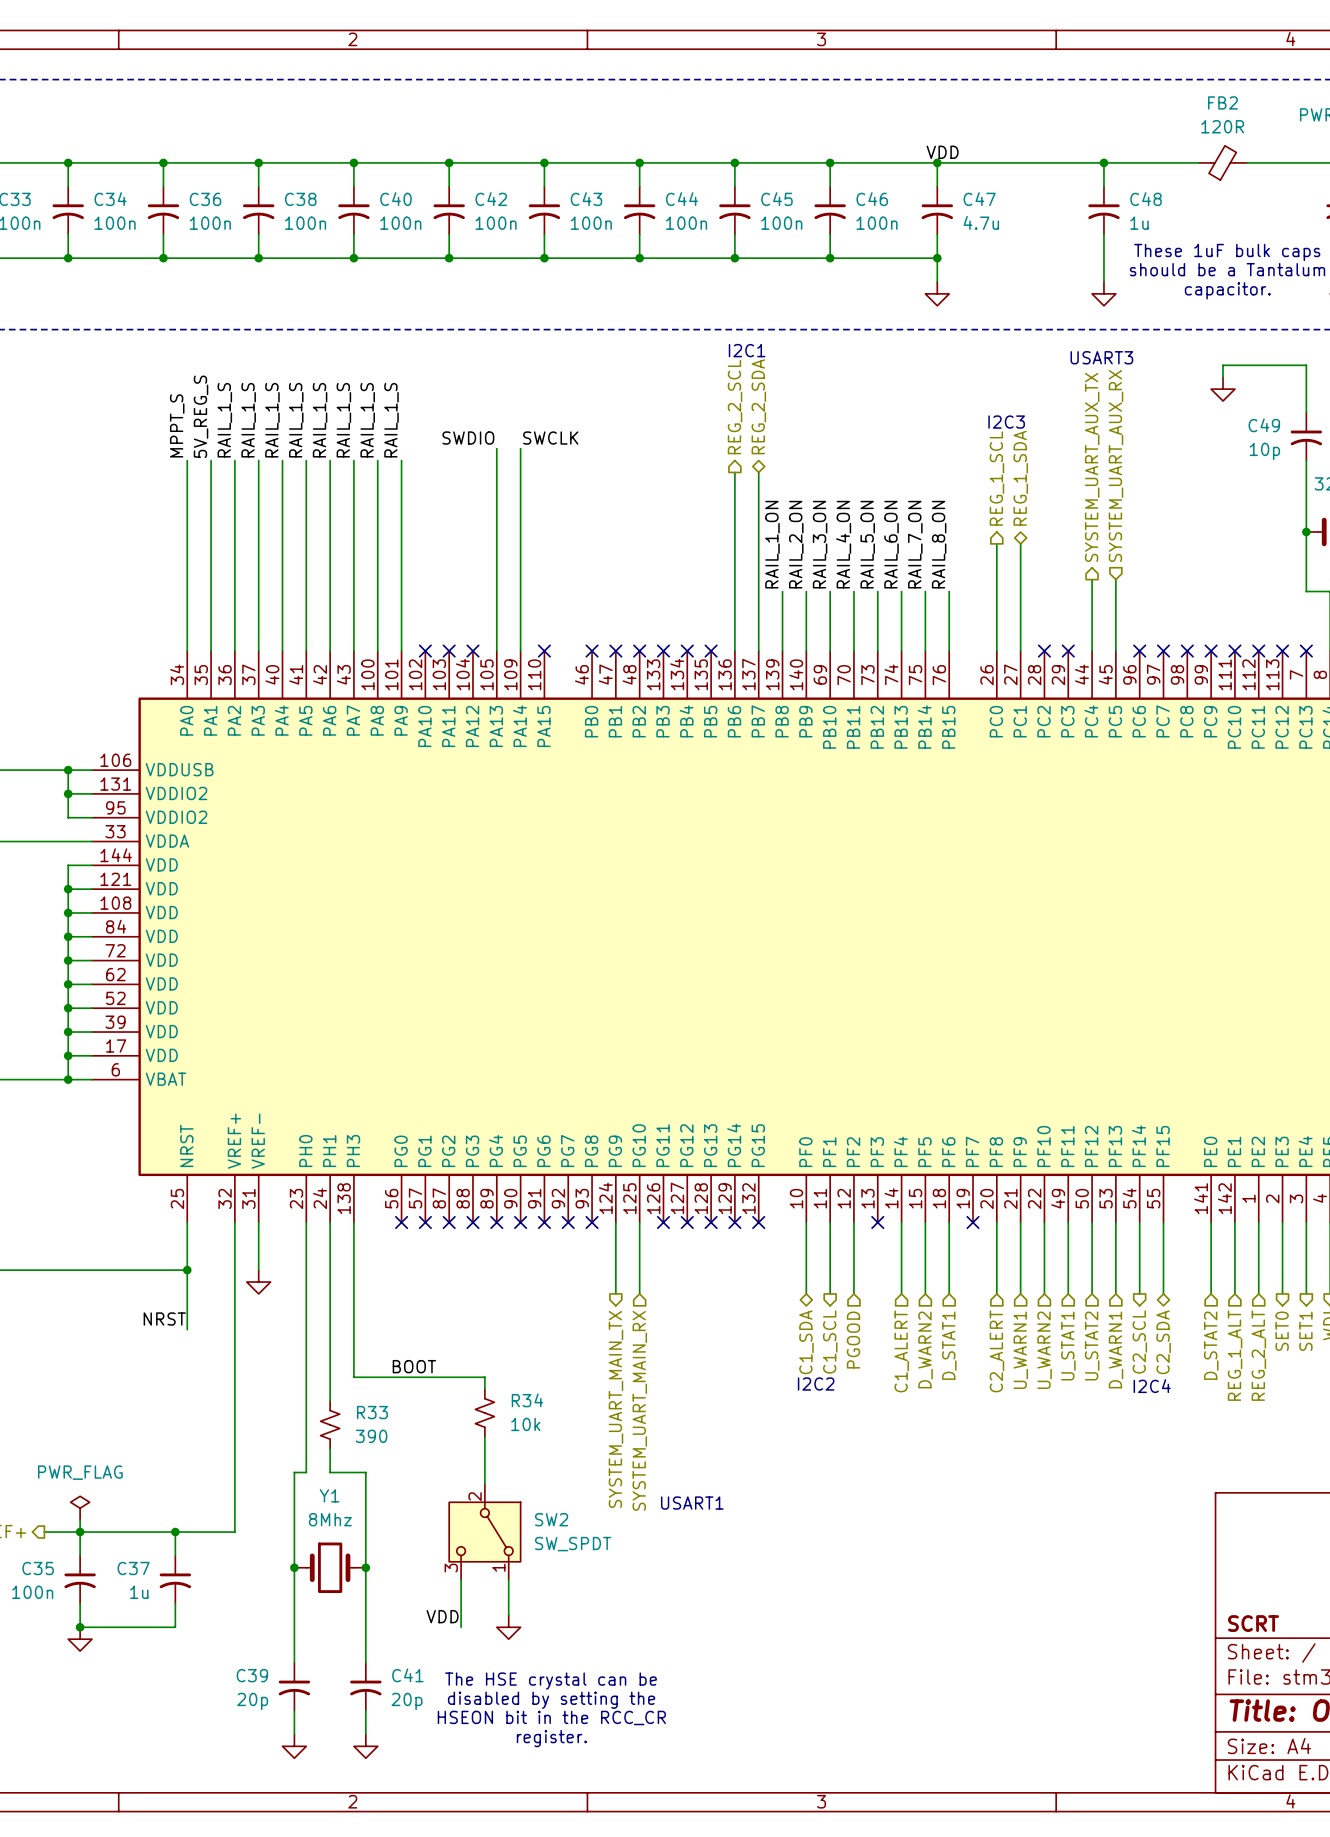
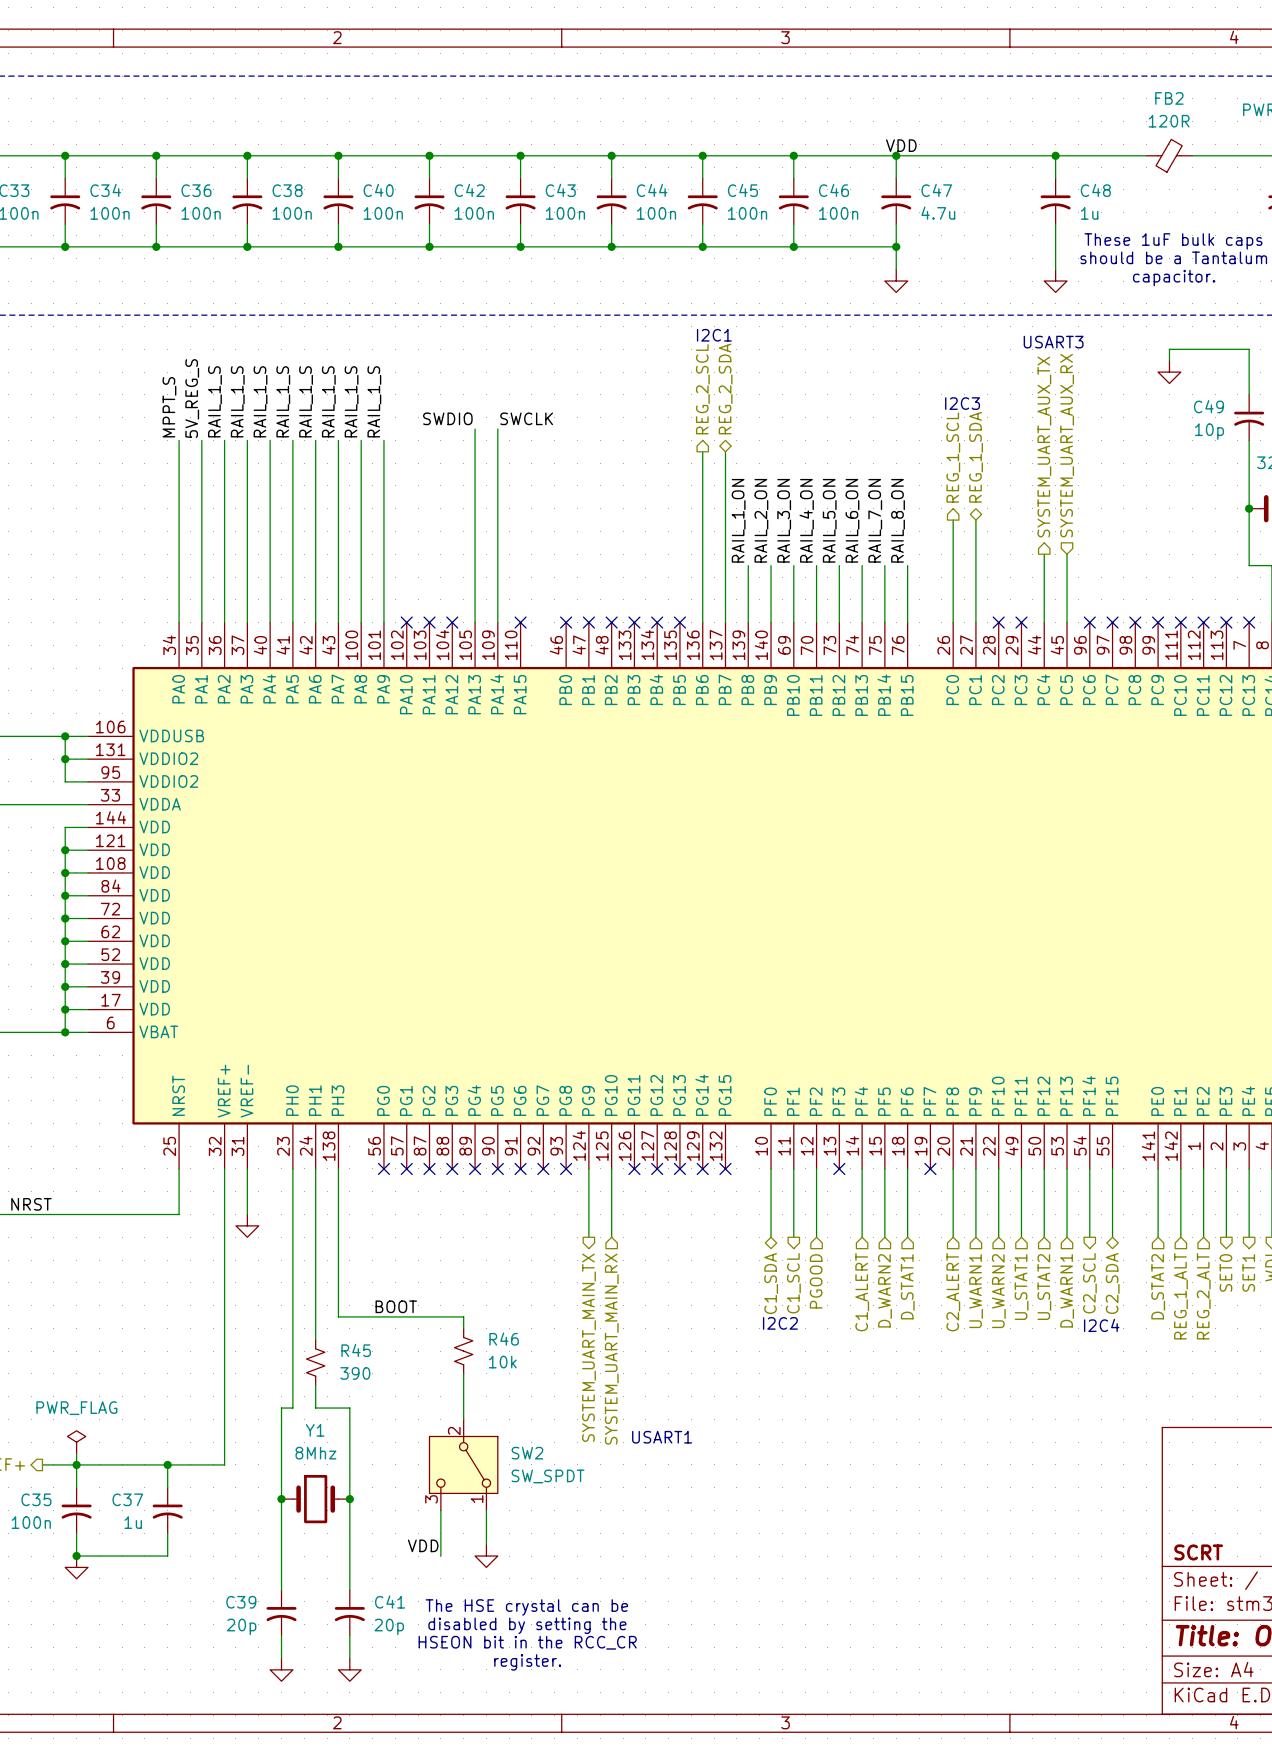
wire: (187, 1270) (187, 1329) -> none
junction: (187, 1270) -> none
label position: NRST (164, 1319) -> NRST (31, 1204)
R34 name: R34 (527, 1400) -> R46 (504, 1339)
R33 name: R33 (372, 1412) -> R45 (356, 1350)

